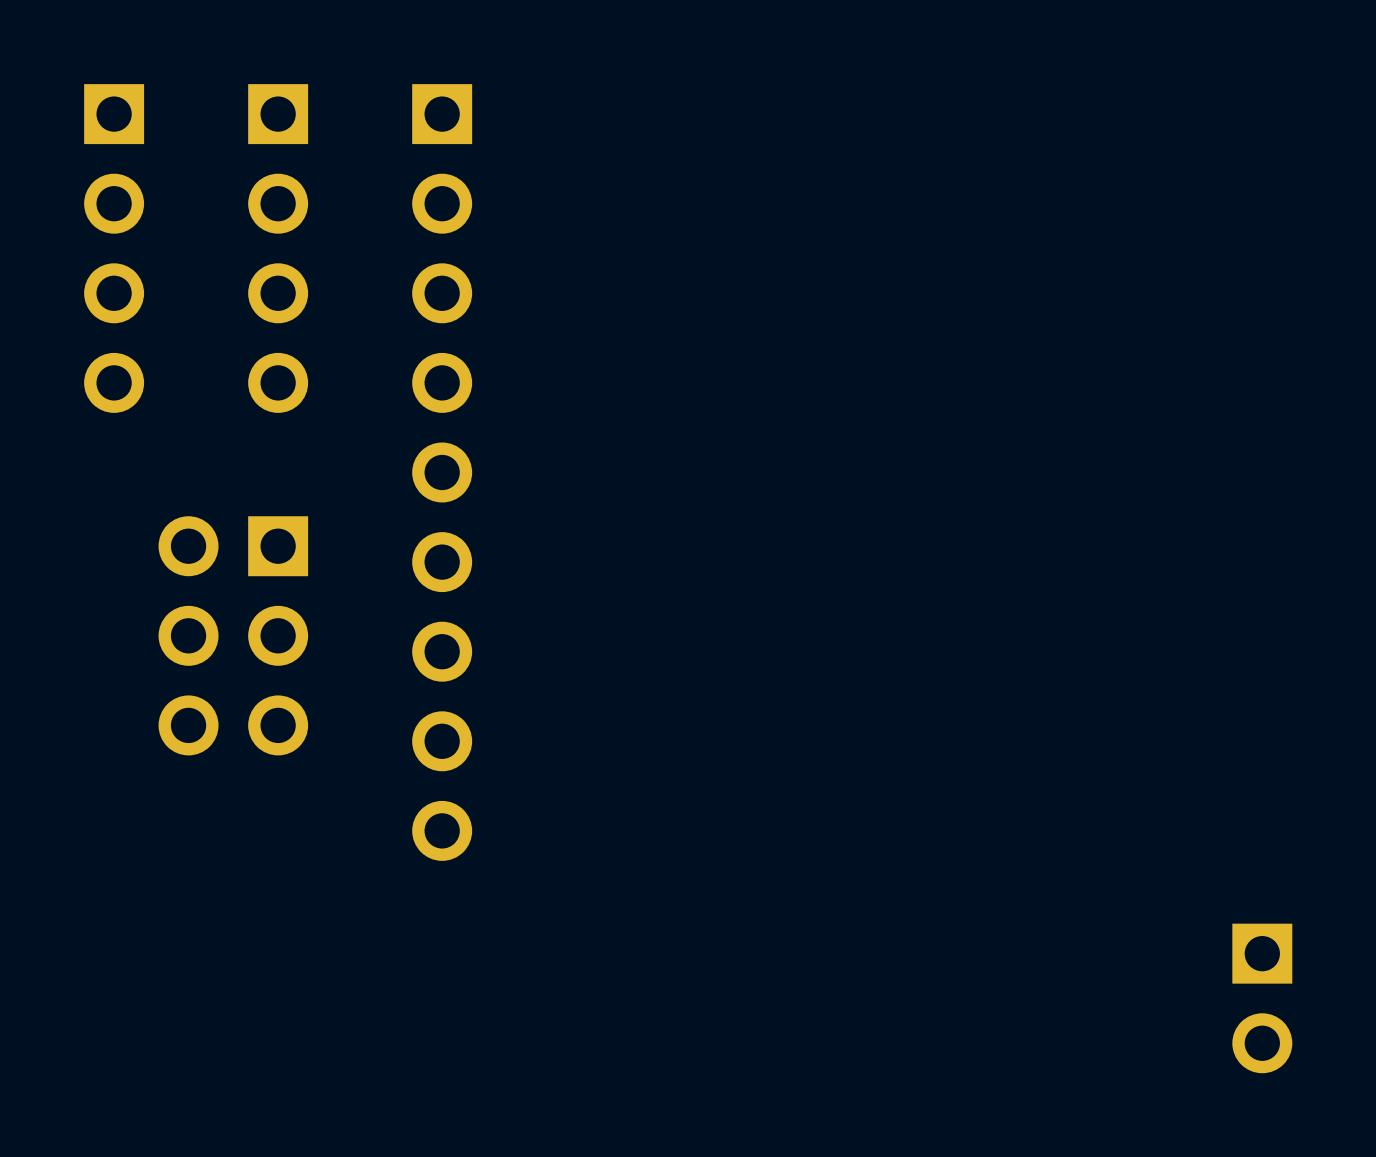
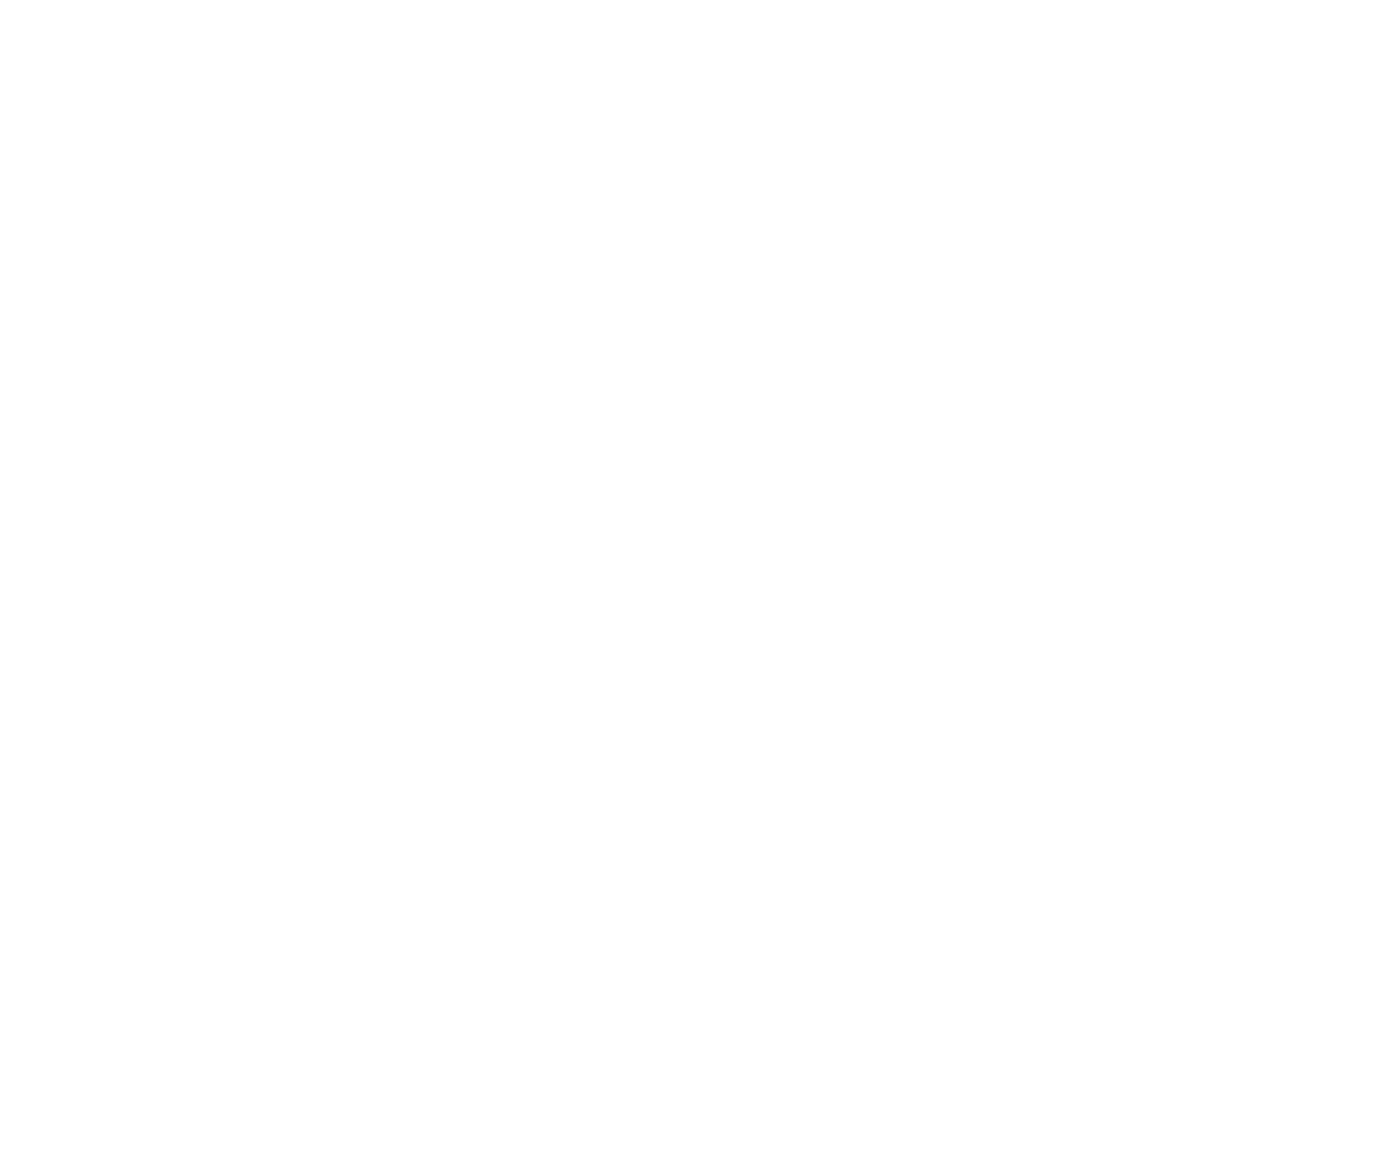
part: (114, 248) -> none
part: (278, 248) -> none
part: (442, 472) -> none
part: (233, 635) -> none
part: (1262, 998) -> none

